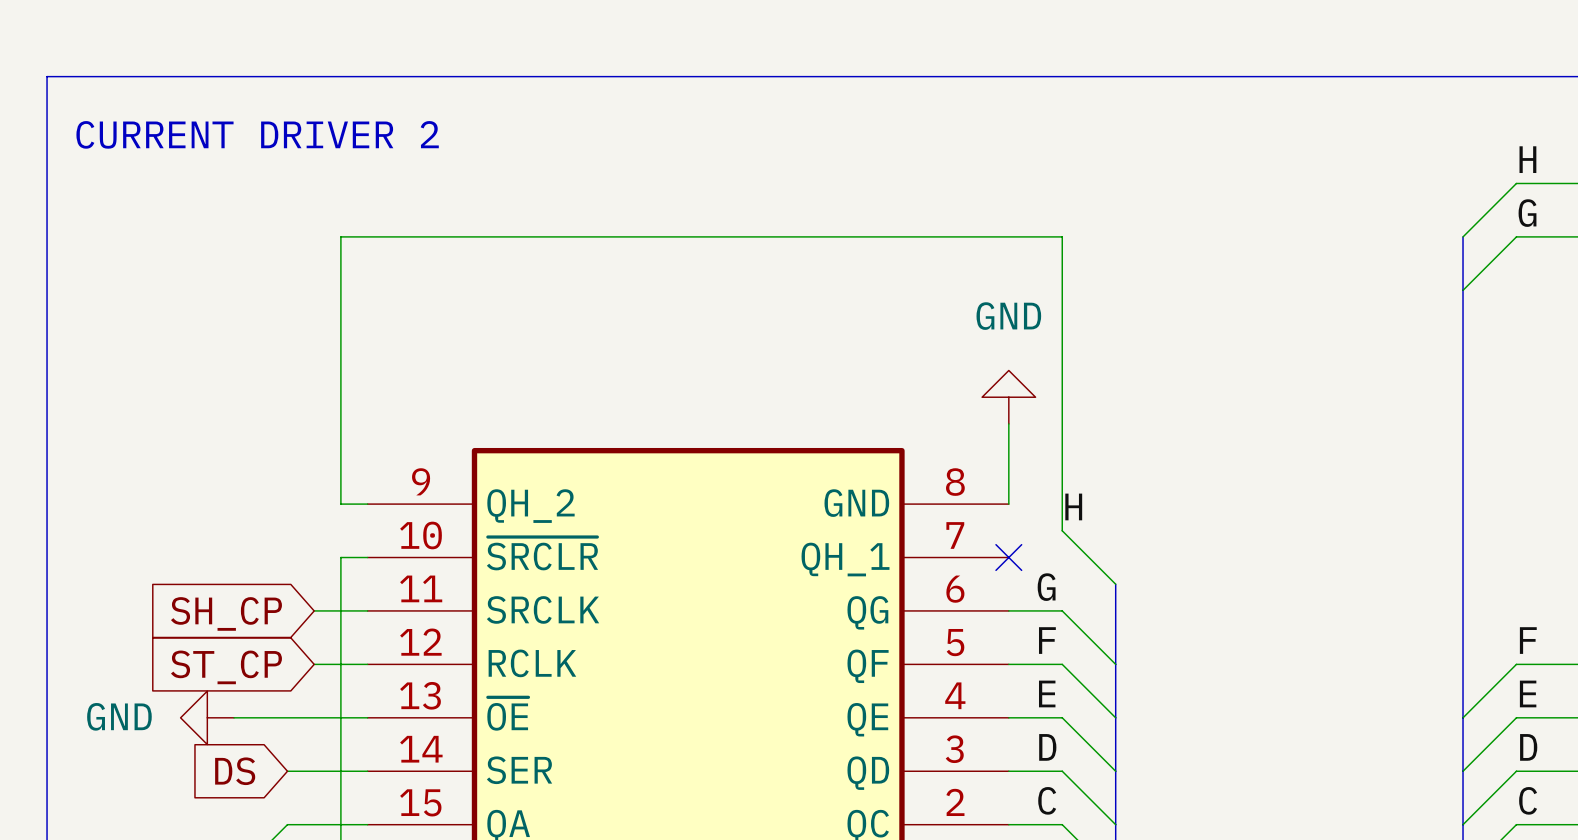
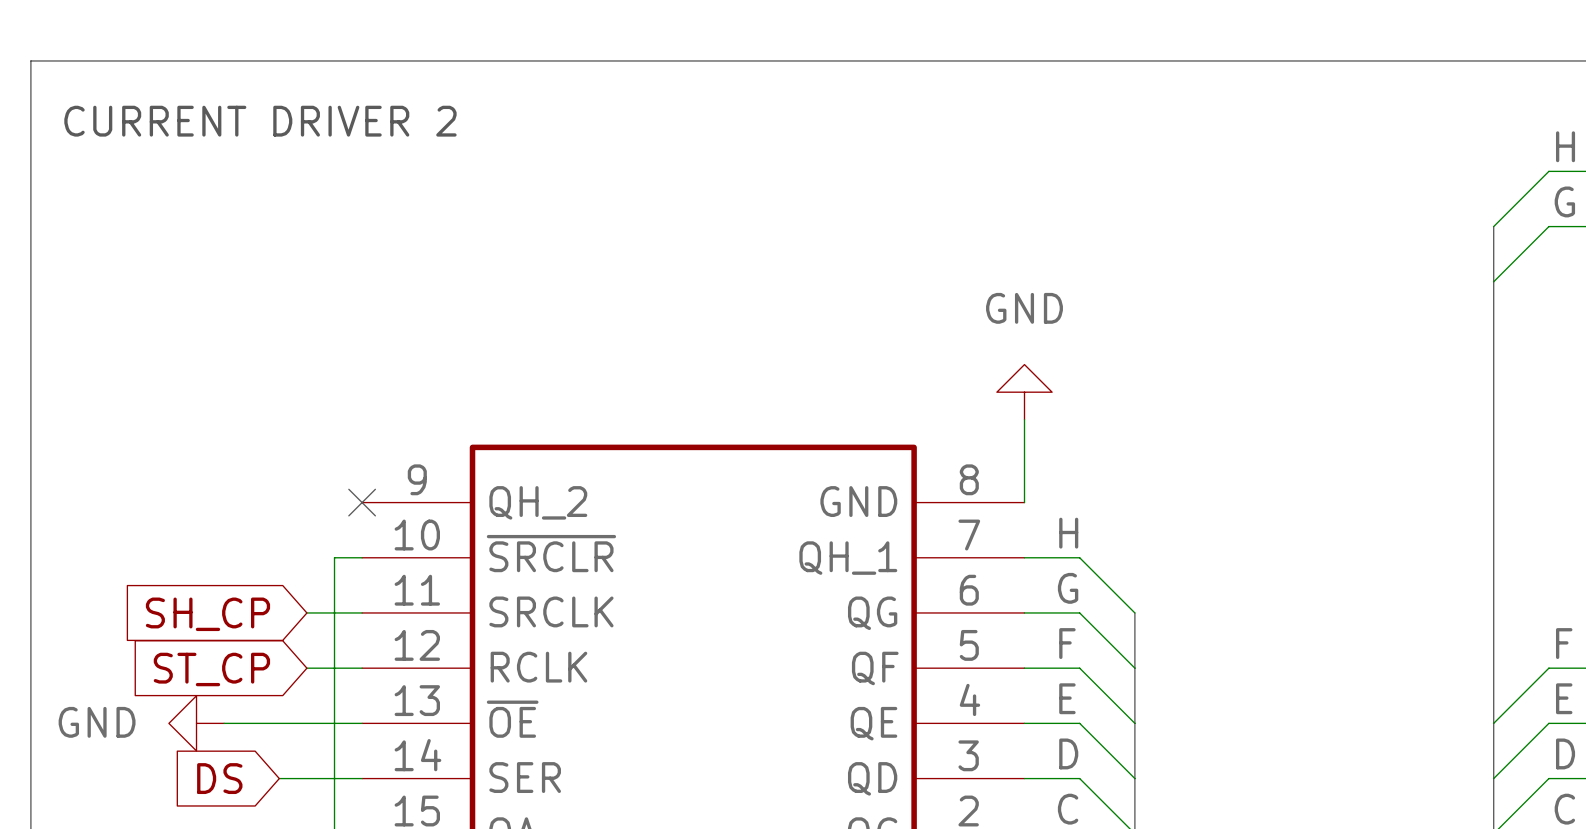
wire: (367, 504) (340, 504) (340, 236) (1062, 236) (1062, 530) (1115, 584) -> none
no-connect mark: none -> (362, 502)
label position: H (1073, 506) -> H (1068, 533)
wire: none -> (1024, 557) (1079, 557) (1134, 612)
no-connect mark: (1008, 557) -> none
bus: (1115, 584) (1115, 610) -> none

